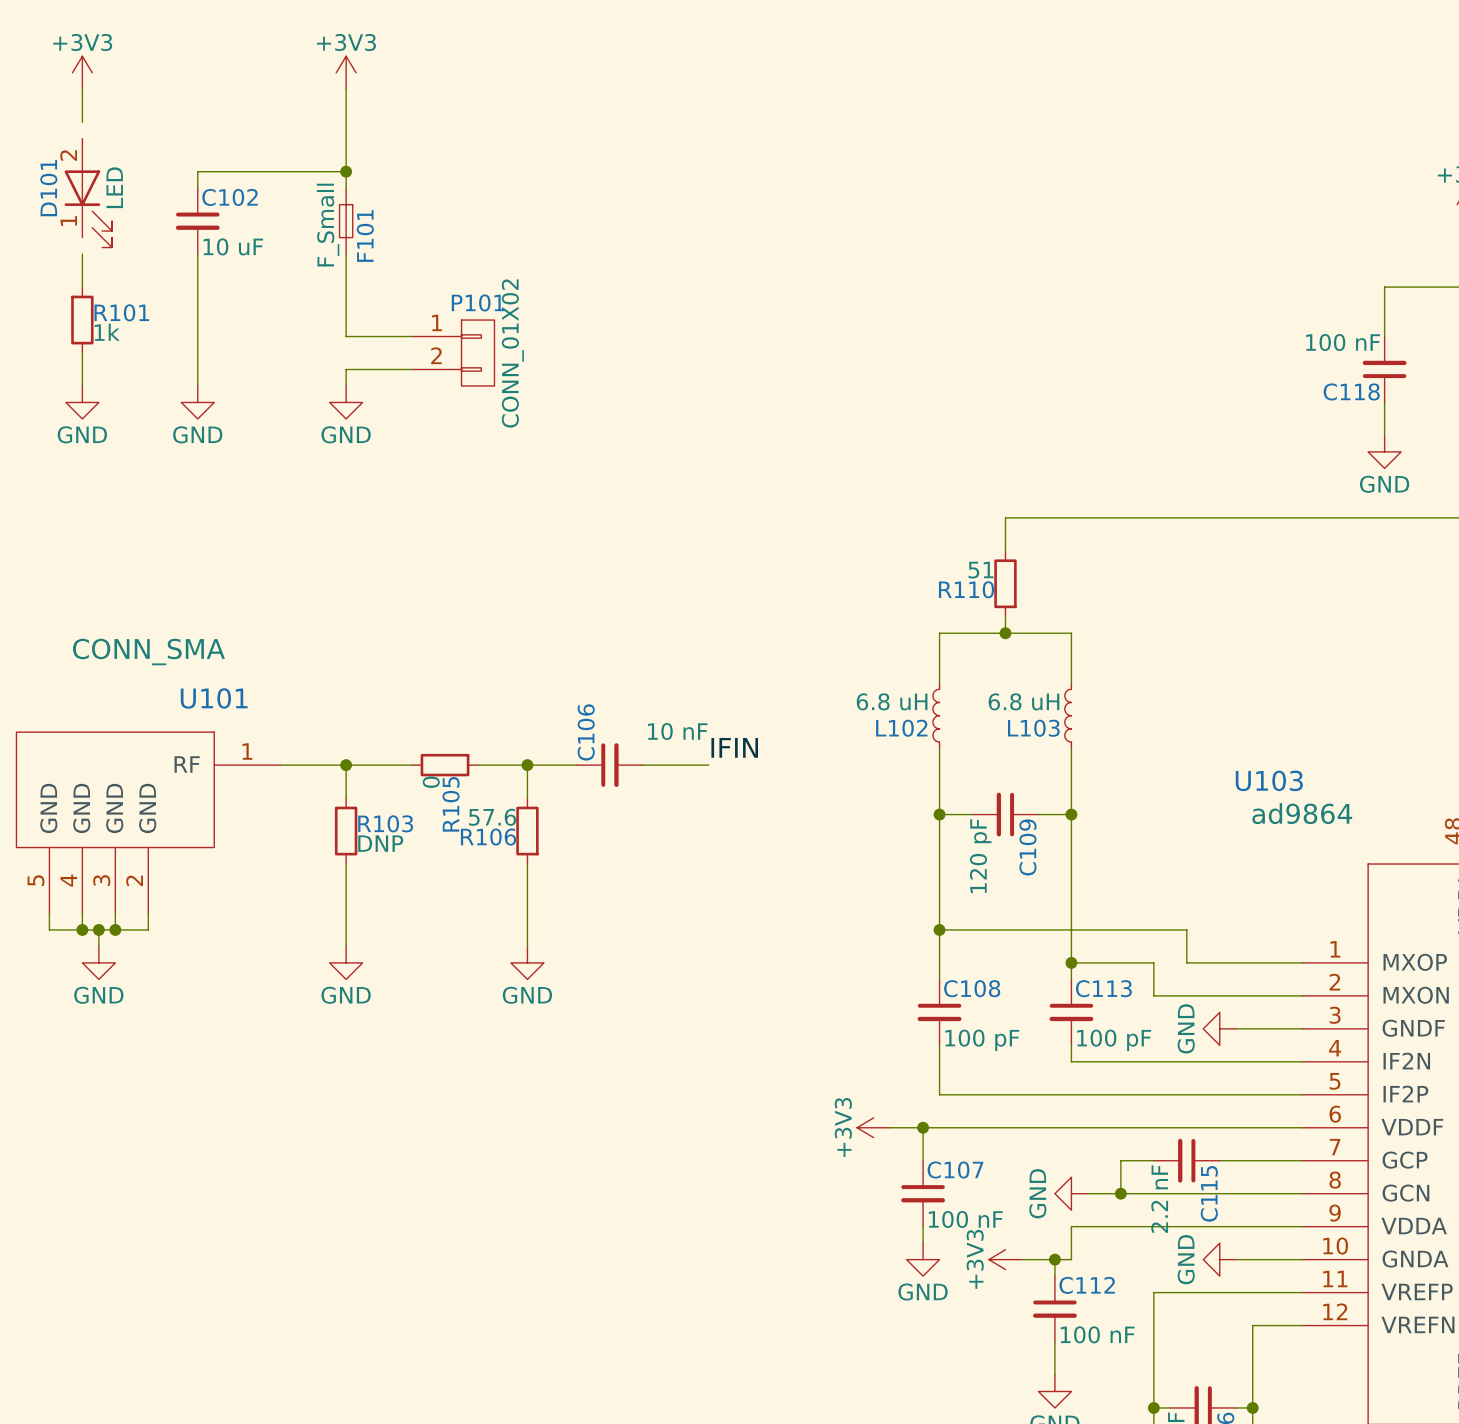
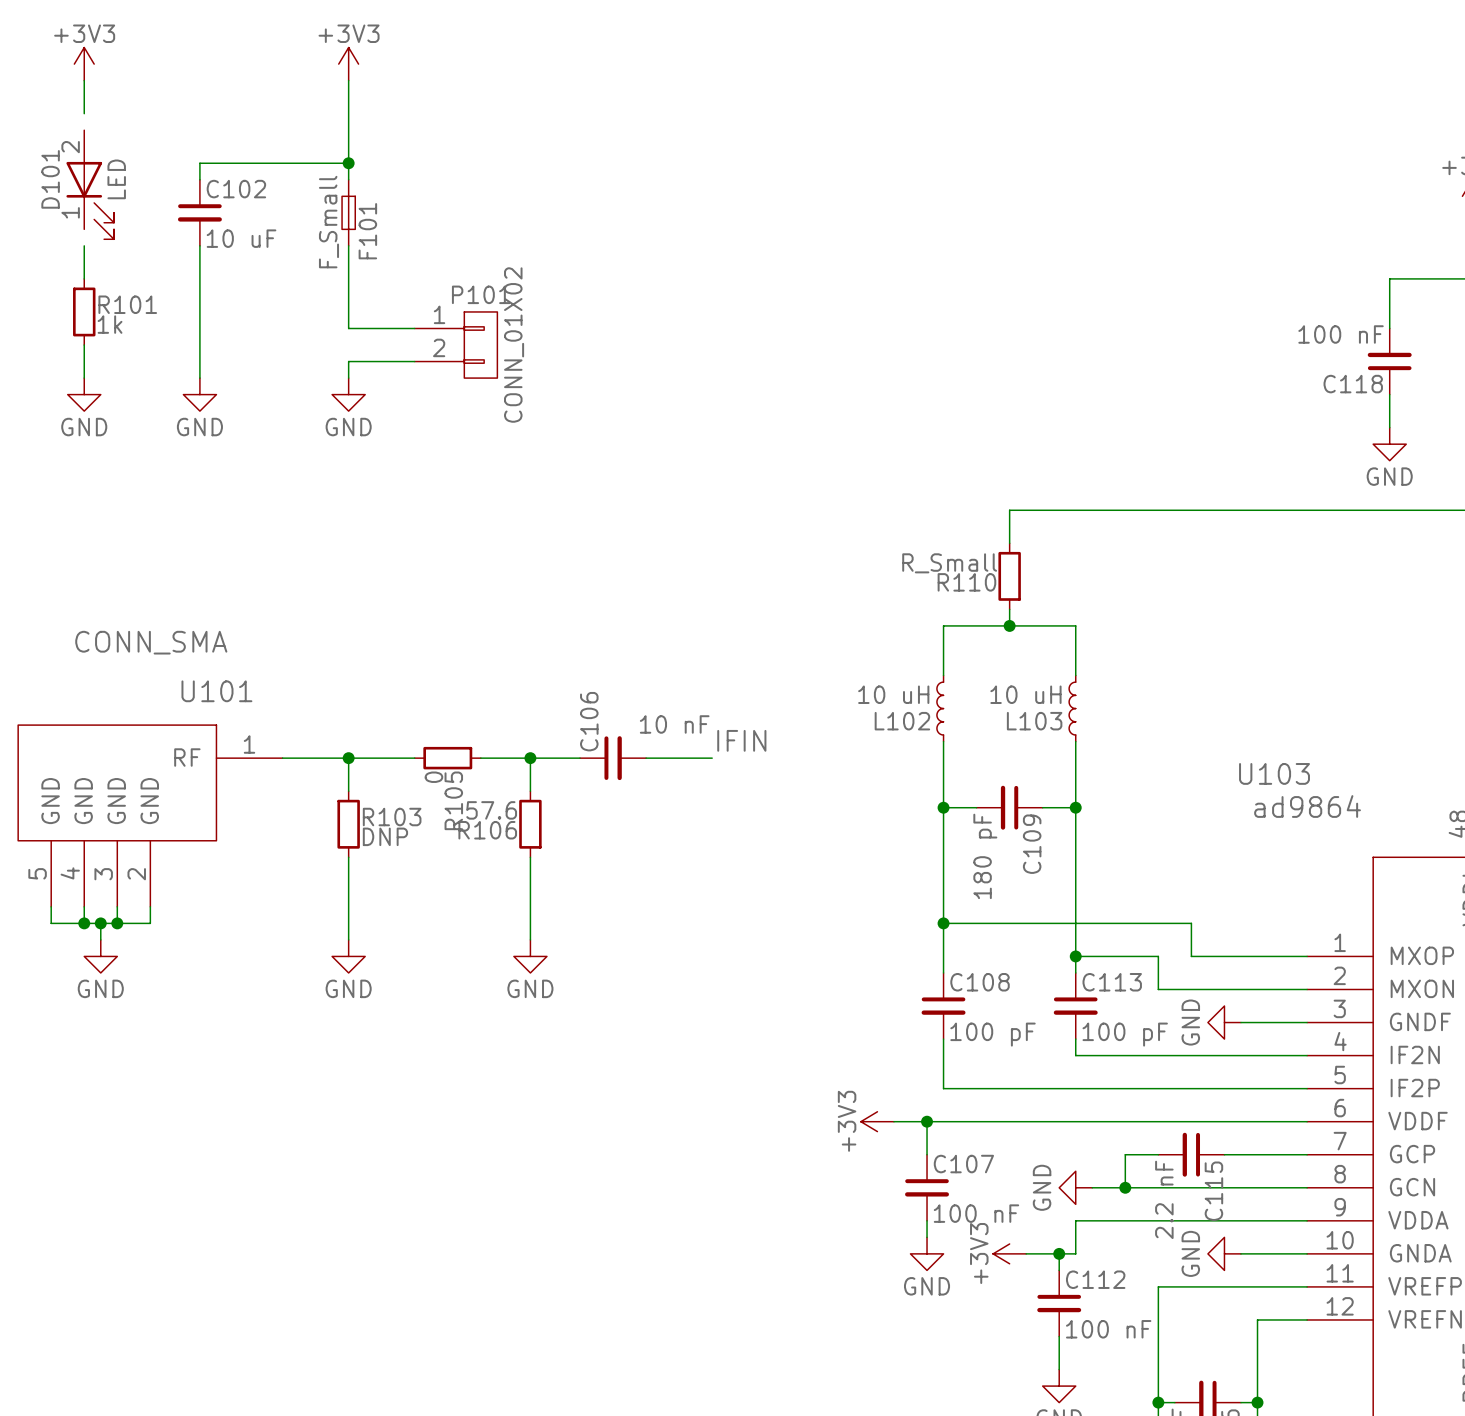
R110 value: 51 (981, 570) -> R_Small (949, 563)
L102 value: 6.8 uH (892, 701) -> 10 uH (893, 694)
L103 value: 6.8 uH (1023, 701) -> 10 uH (1025, 694)
C109 value: 120 pF (980, 856) -> 180 pF (985, 856)

